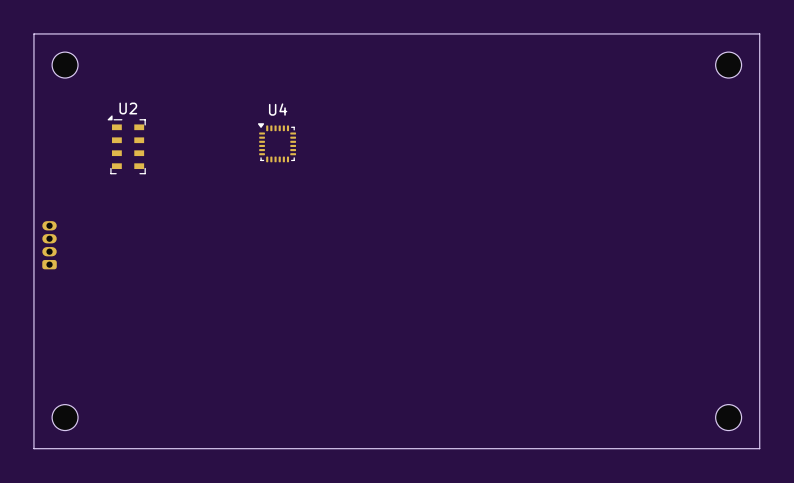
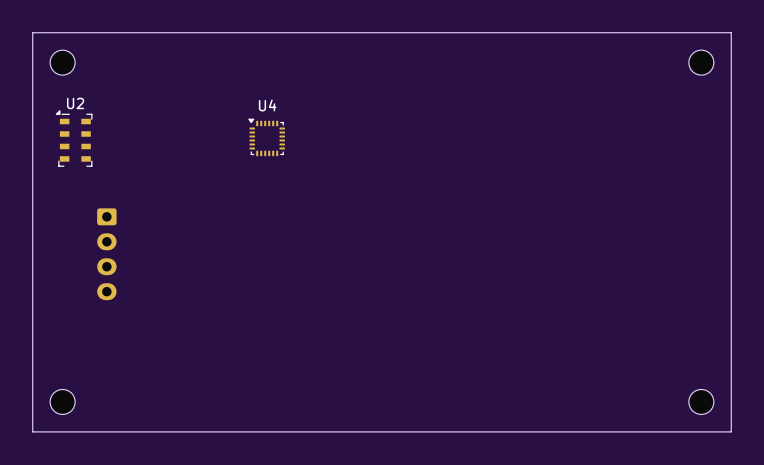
U2 position: (126, 144) -> (74, 138)
part: (49, 245) -> none
part: none -> (106, 254)

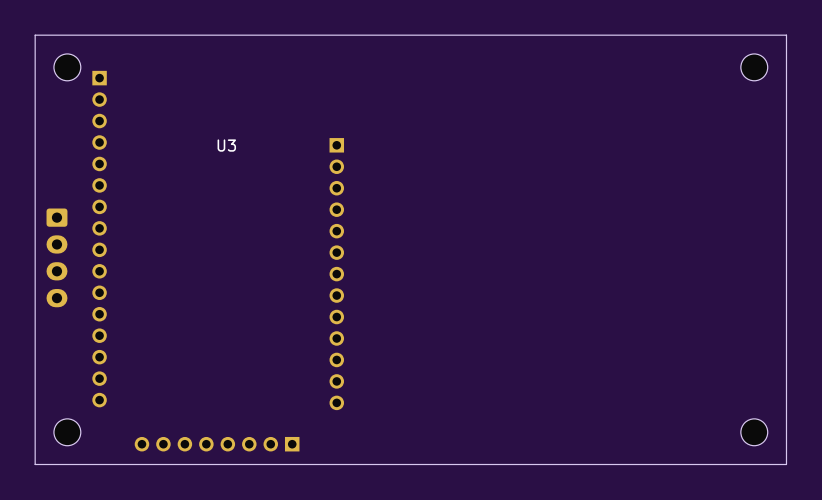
U3: none -> (226, 145)
U4: (266, 137) -> none
U2: (74, 138) -> none
part: none -> (99, 239)
part position: (106, 254) -> (56, 257)
part: none -> (336, 274)
part: none -> (217, 444)

